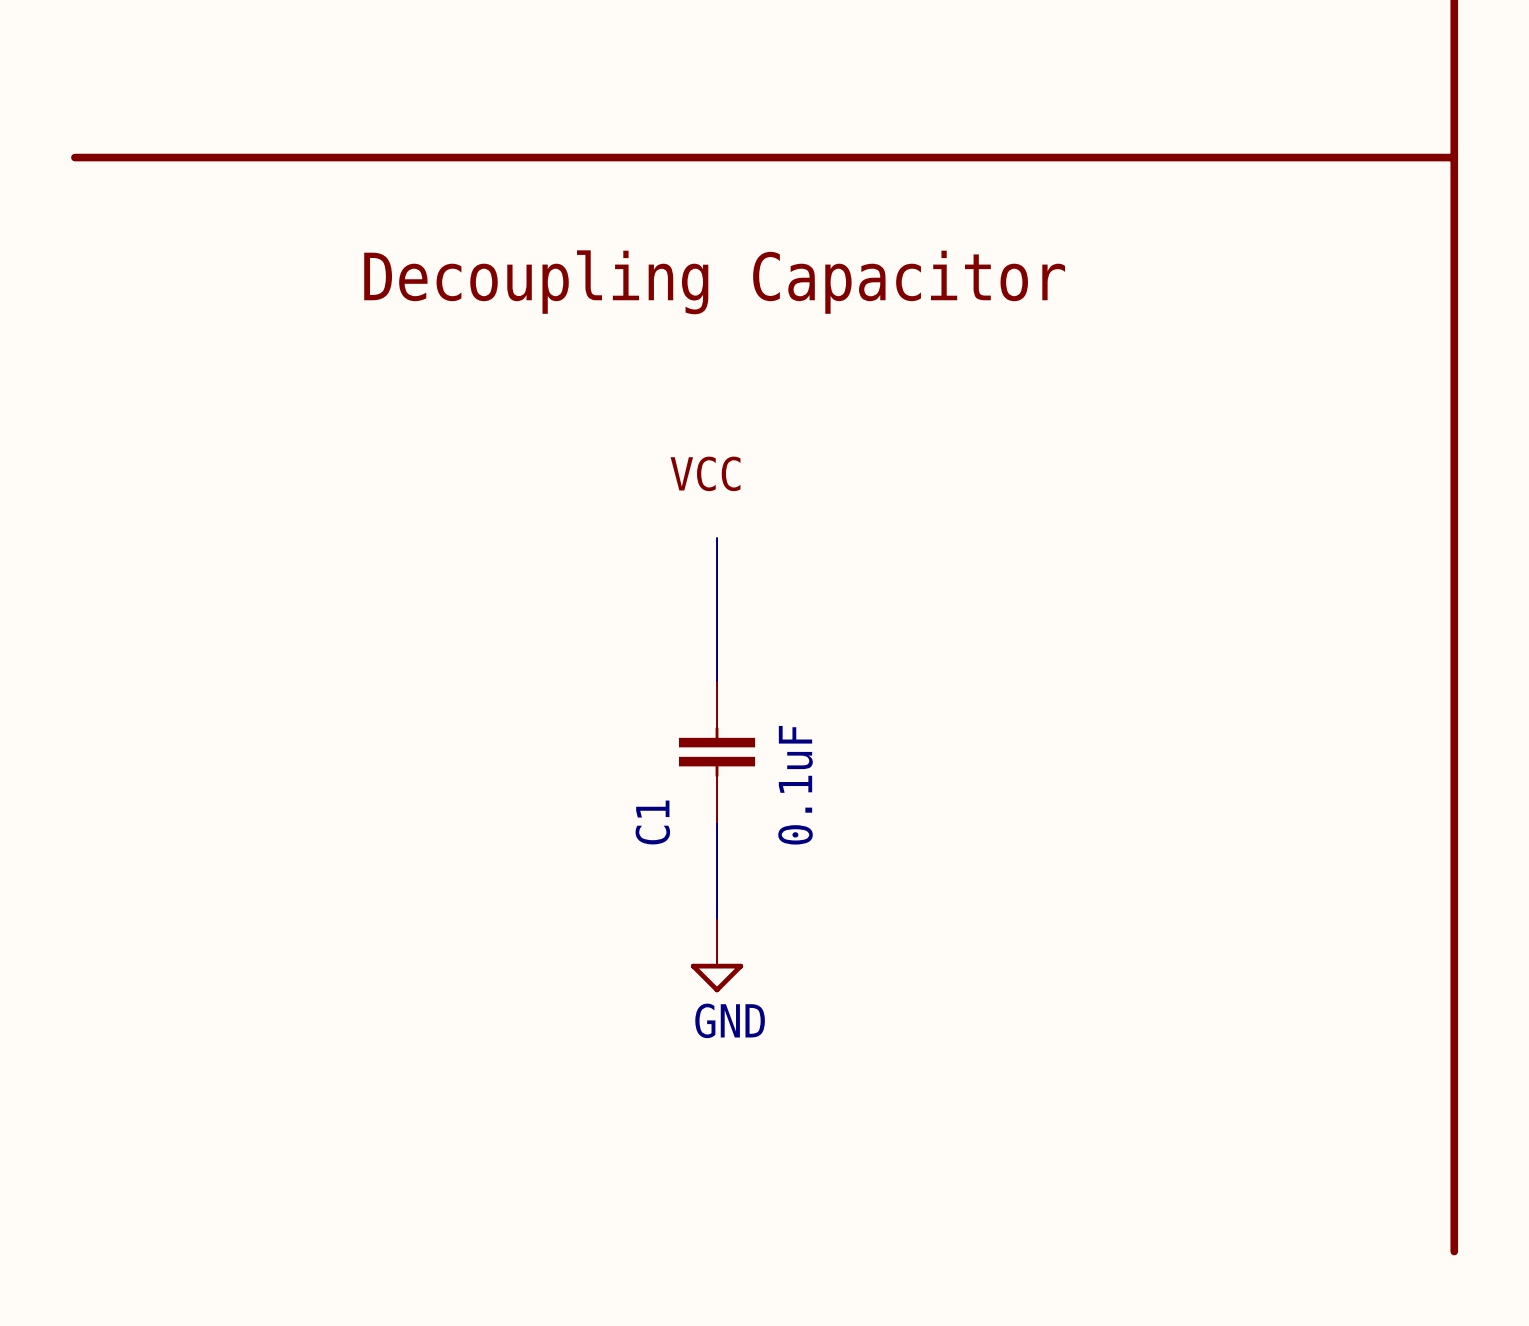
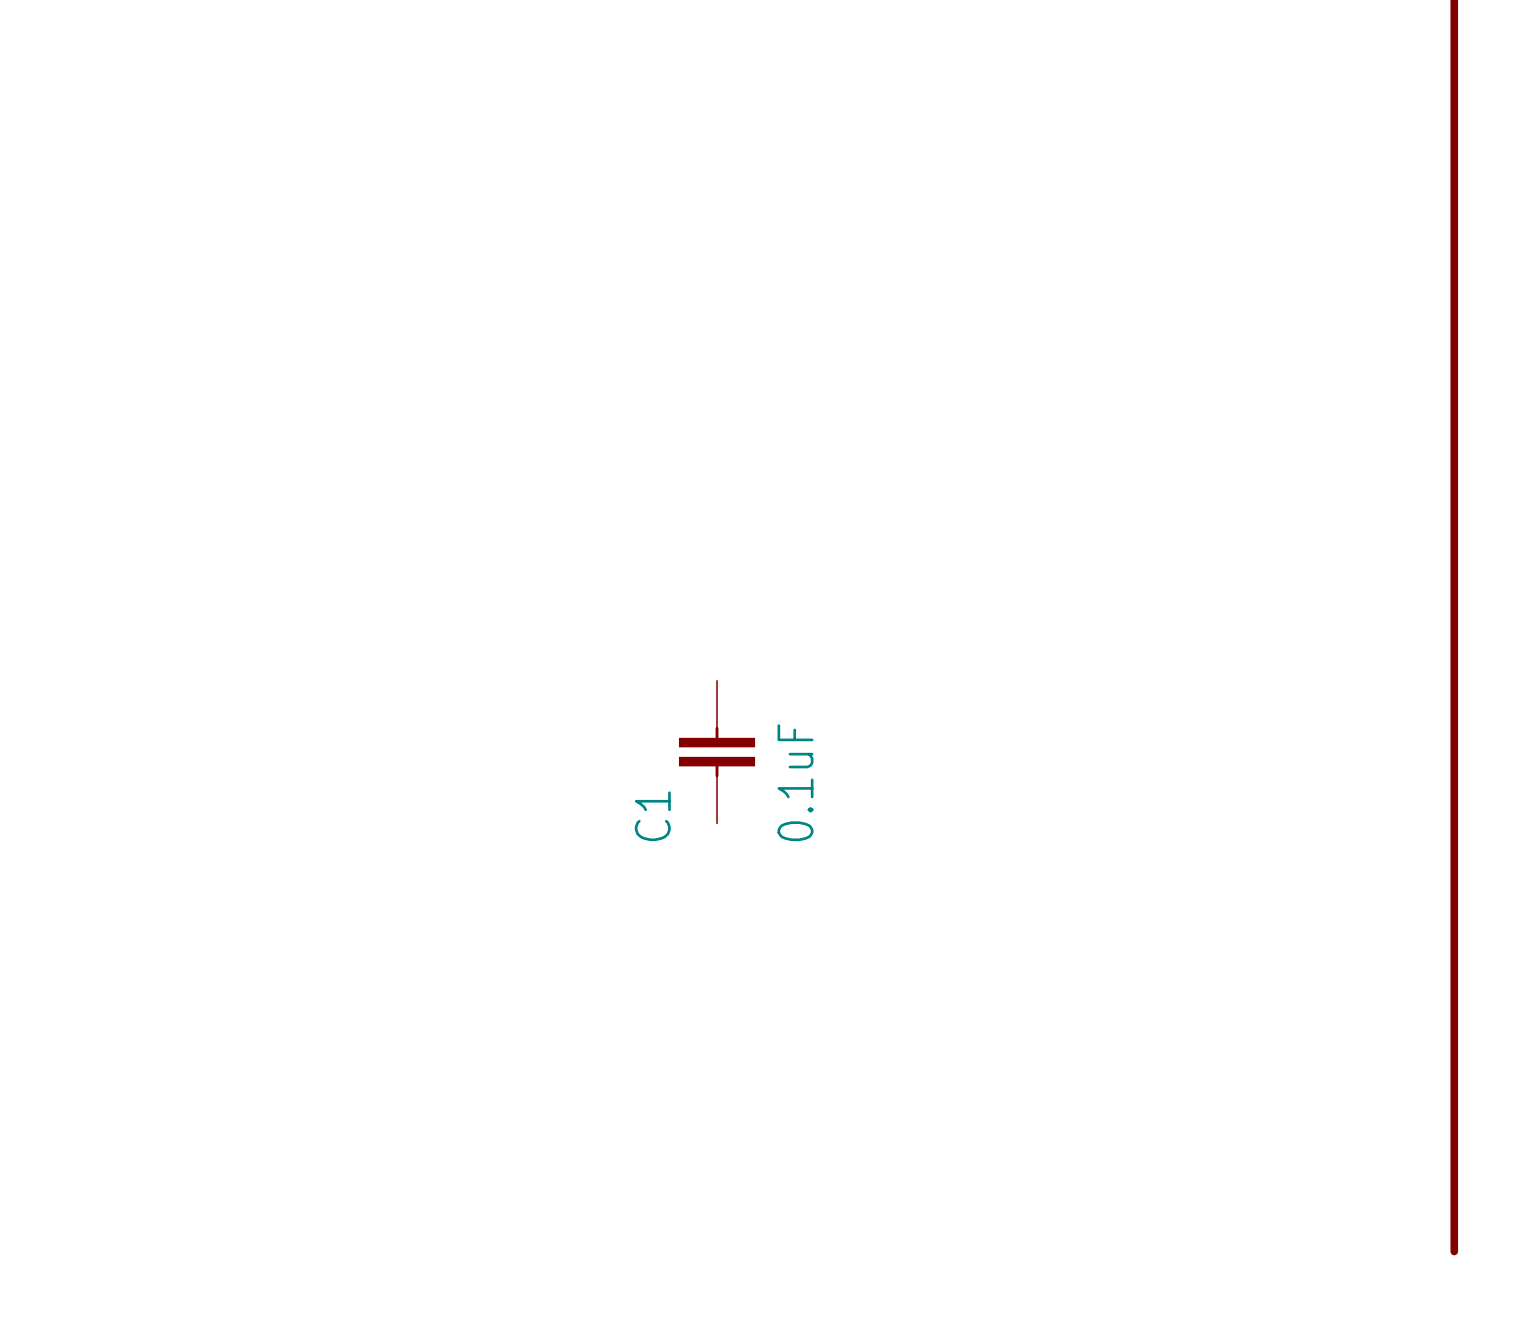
line: (74, 157) (1454, 157) -> none
text: Decoupling Capacitor (714, 282) -> none
label: VCC (705, 473) -> none
wire: (717, 538) (717, 680) -> none
wire: (717, 823) (717, 918) -> none
power symbol: GND (717, 955) -> none

